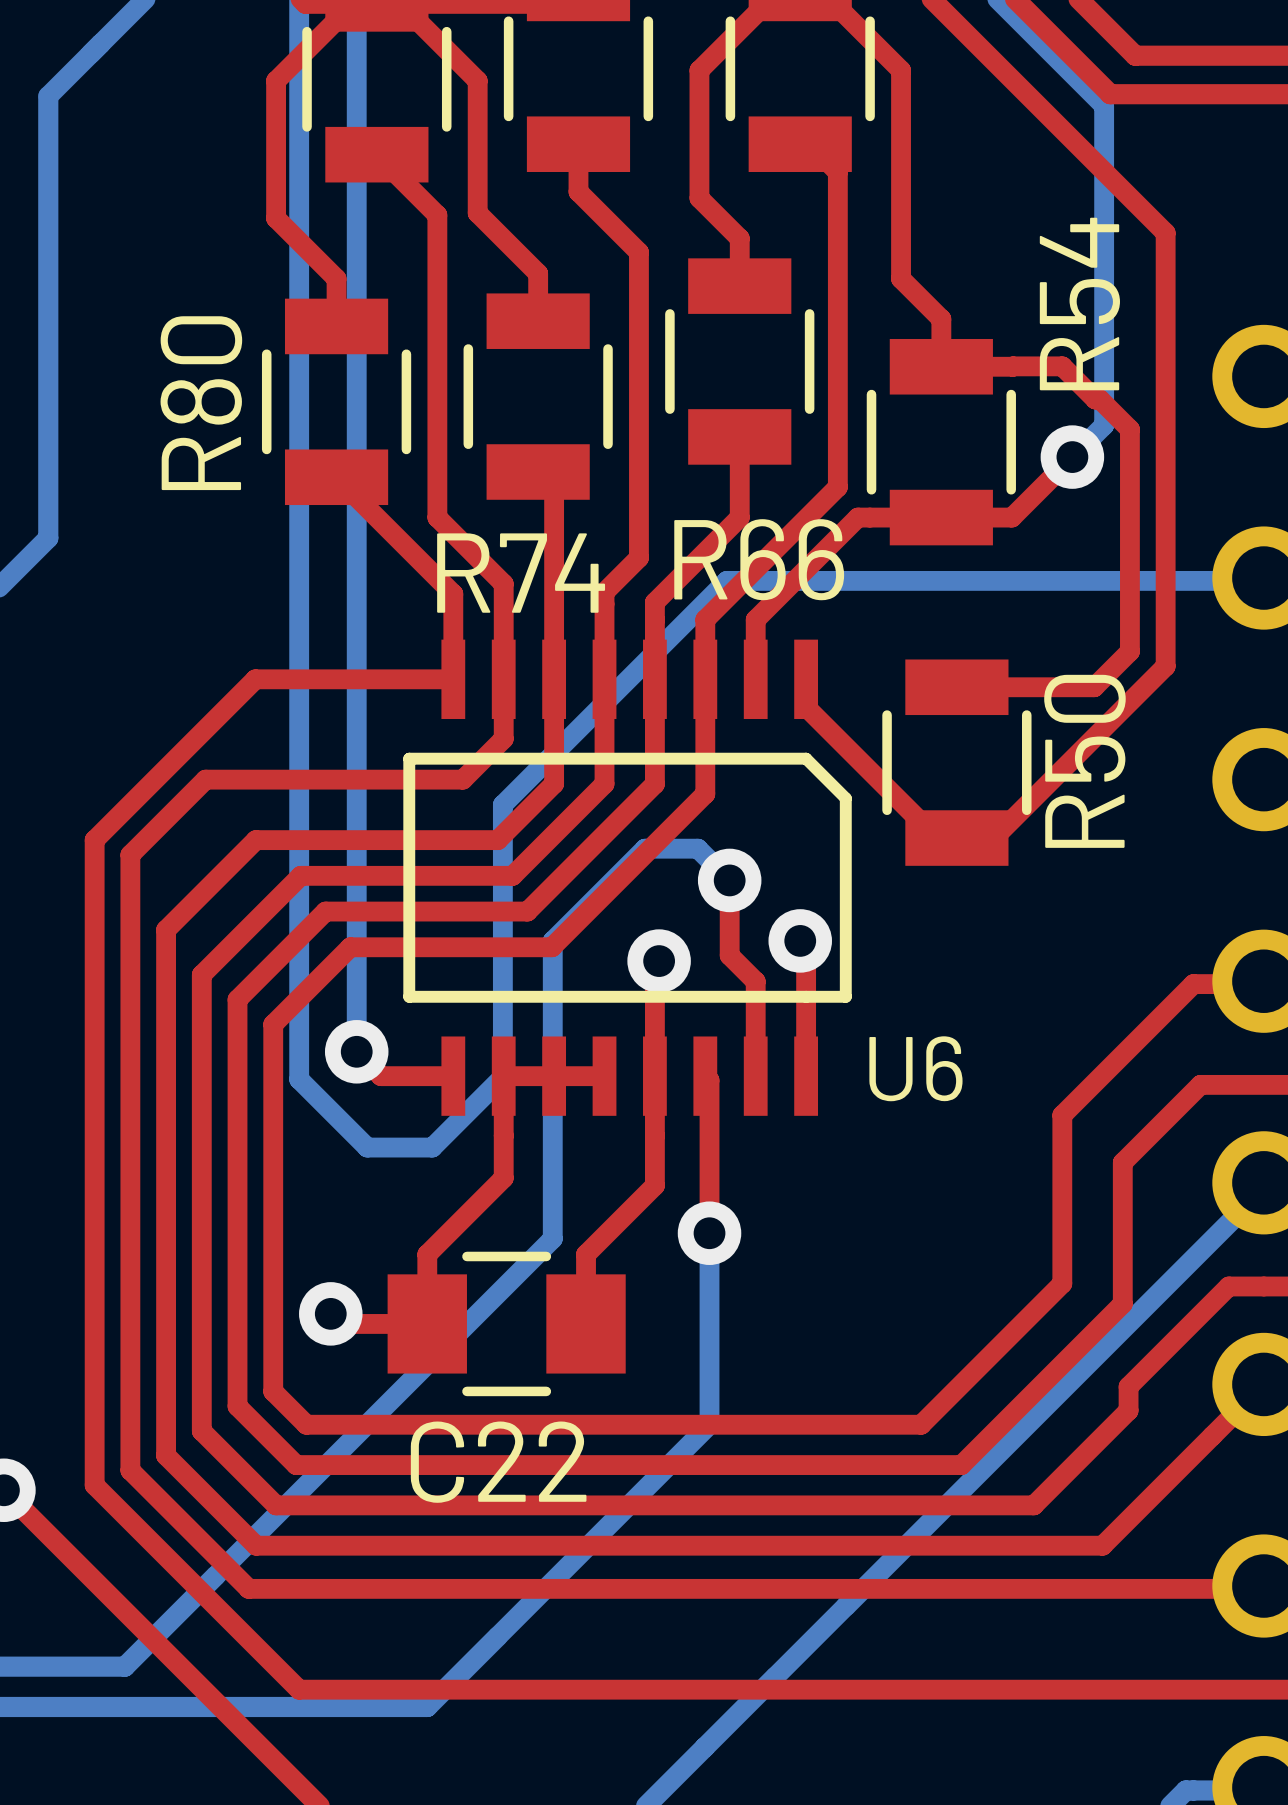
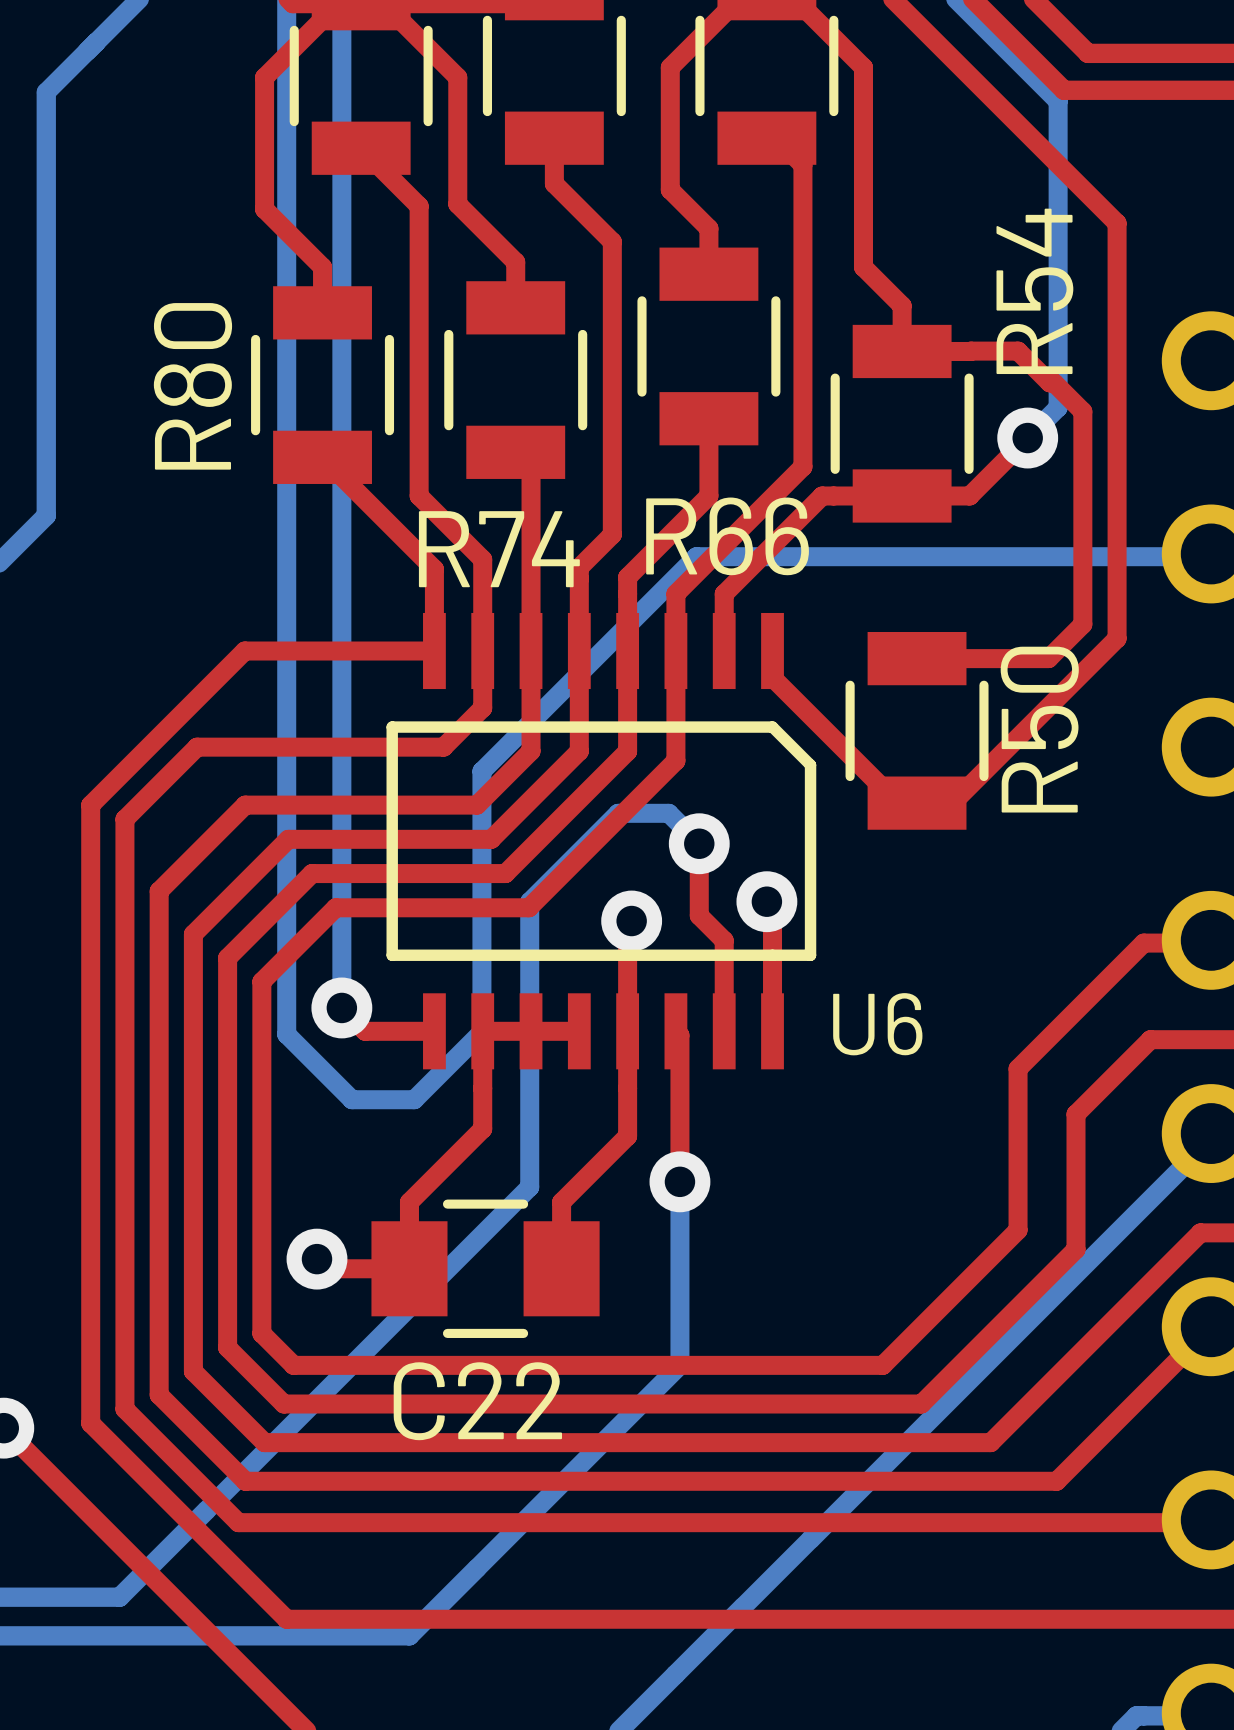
top track: (1252, 1286) (1228, 1286) (1128, 1386) (1128, 1410) -> (1200, 1232) (1081, 1351)

